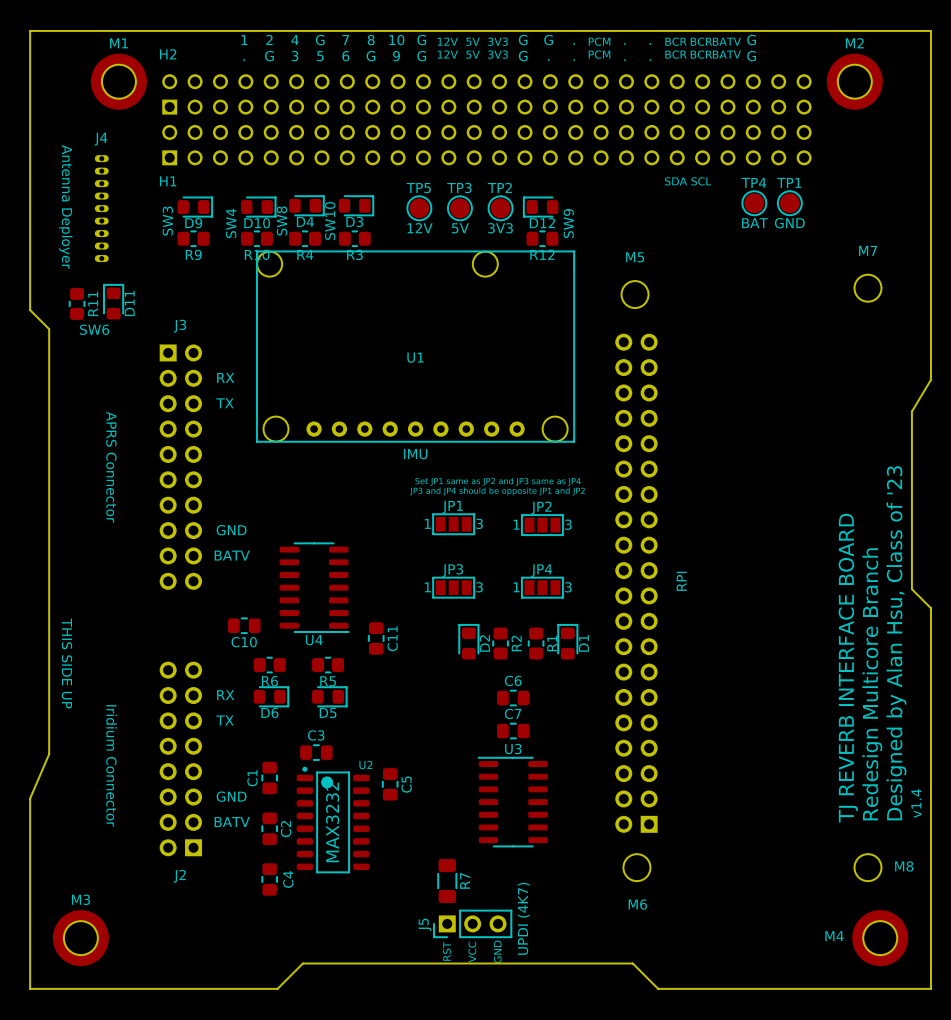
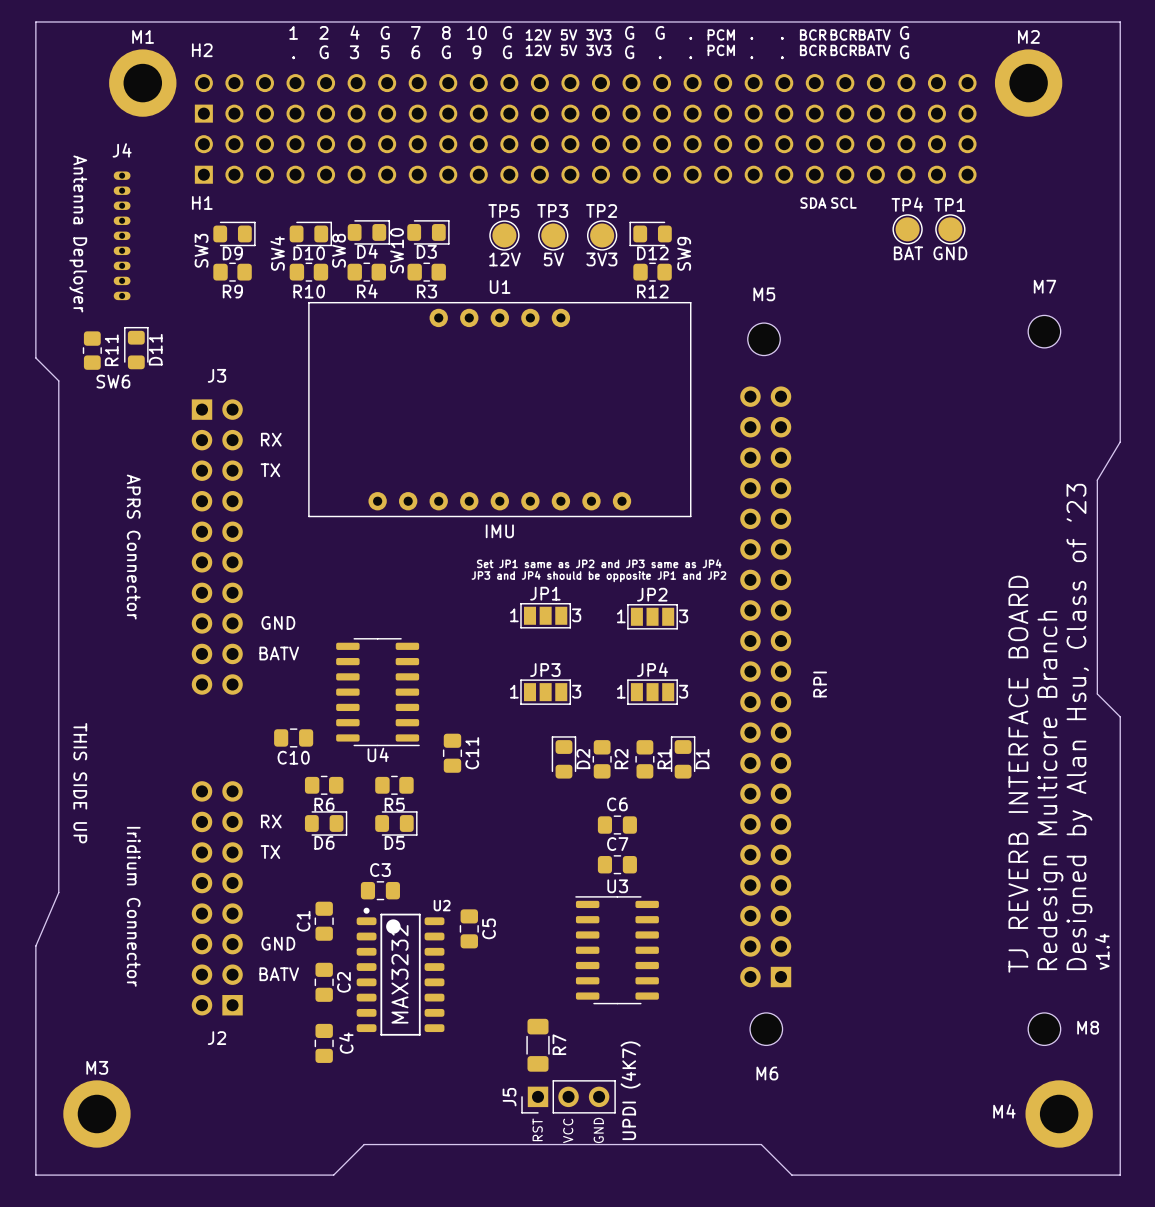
U1 footprint: [256, 250, 575, 443] -> [308, 301, 692, 518]
U1 name position: U1 (415, 357) -> U1 (500, 286)

